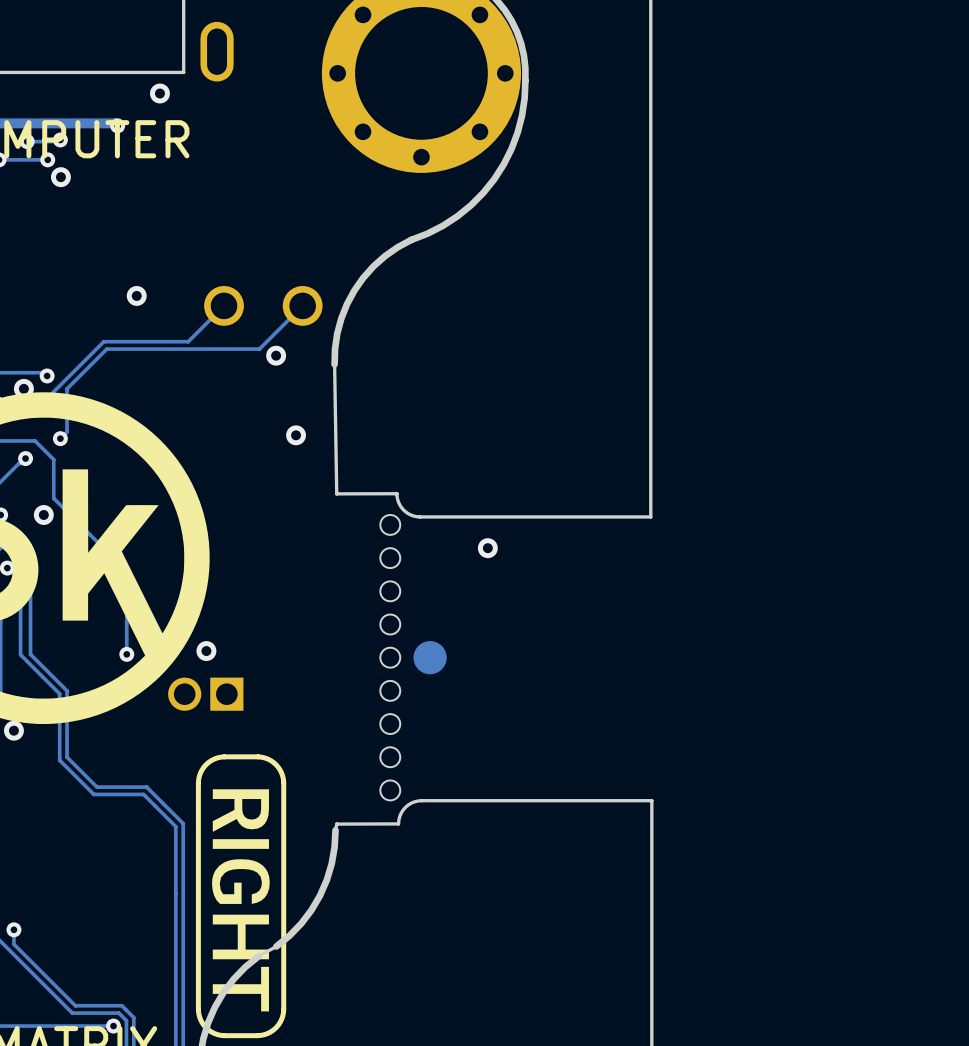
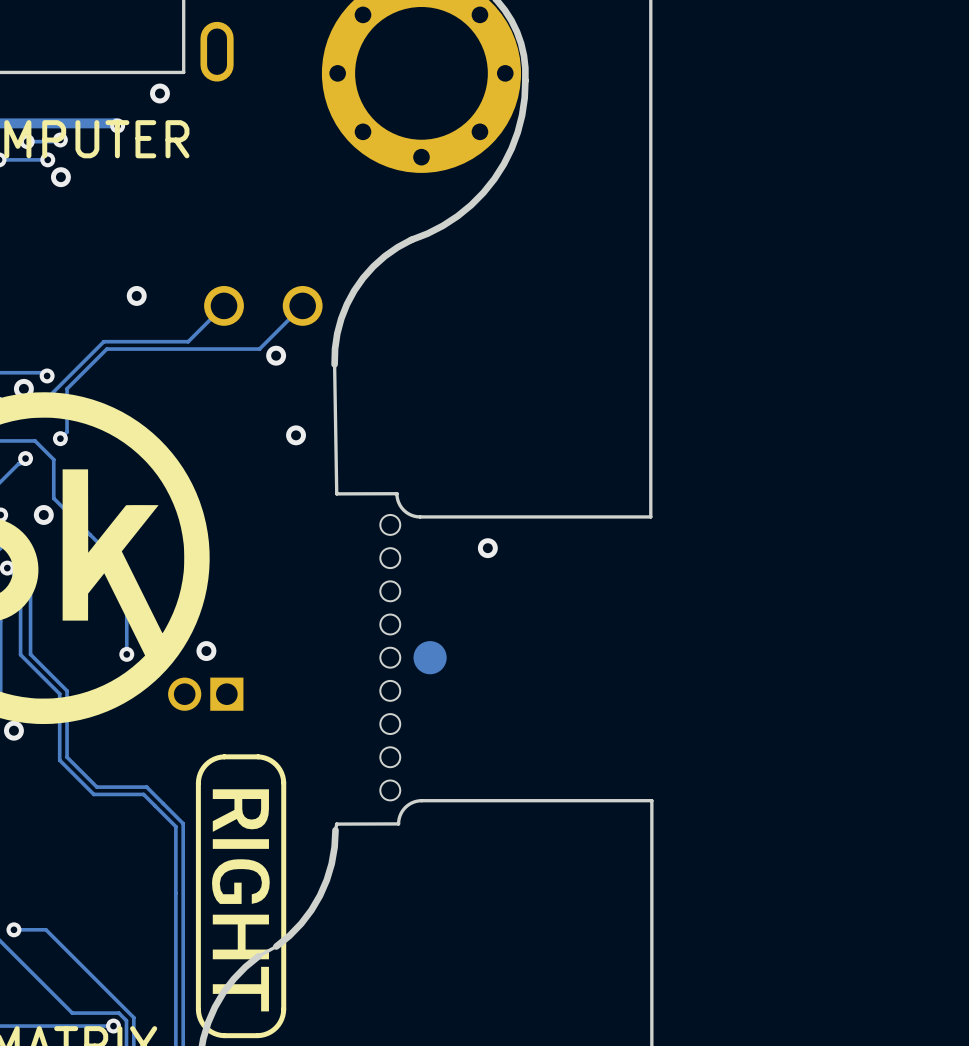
track: (13, 929) (13, 944) (75, 1005) (121, 1005) -> (13, 929) (45, 929) (121, 1005)

